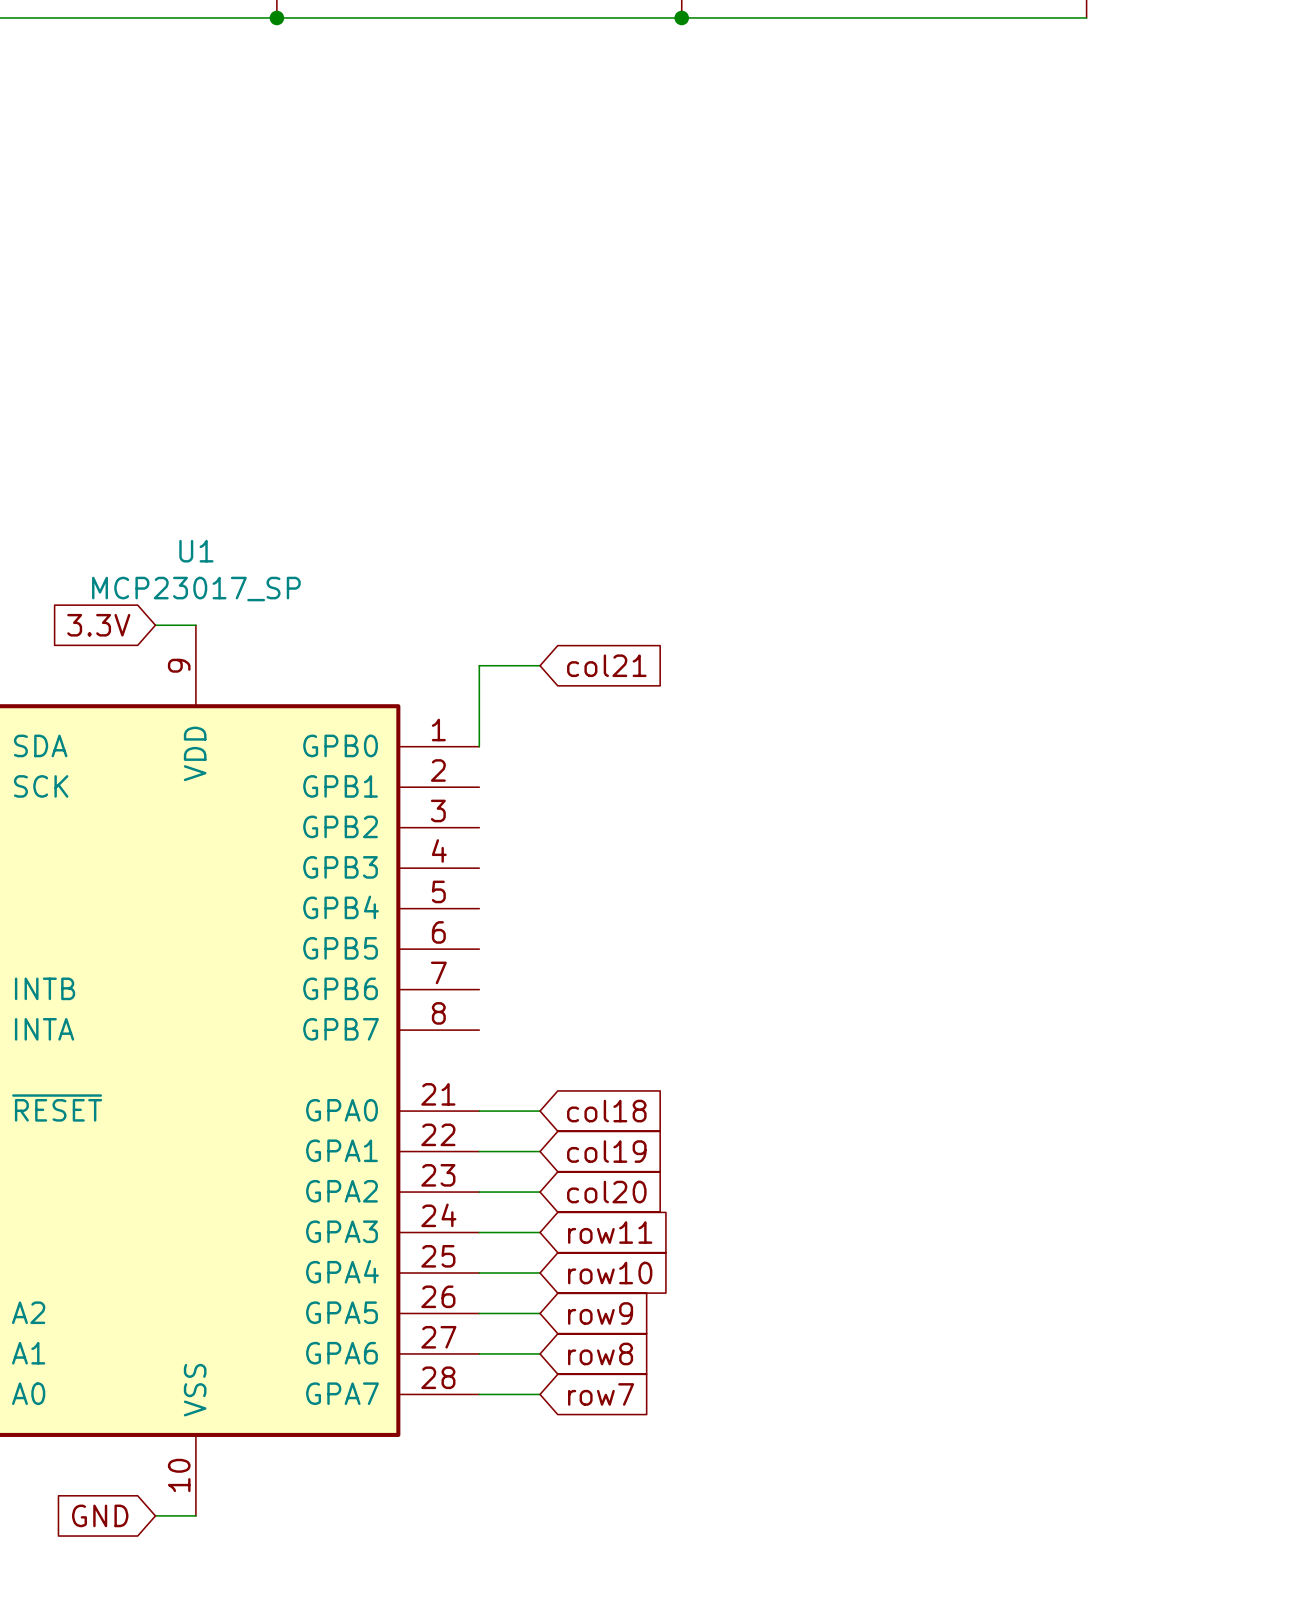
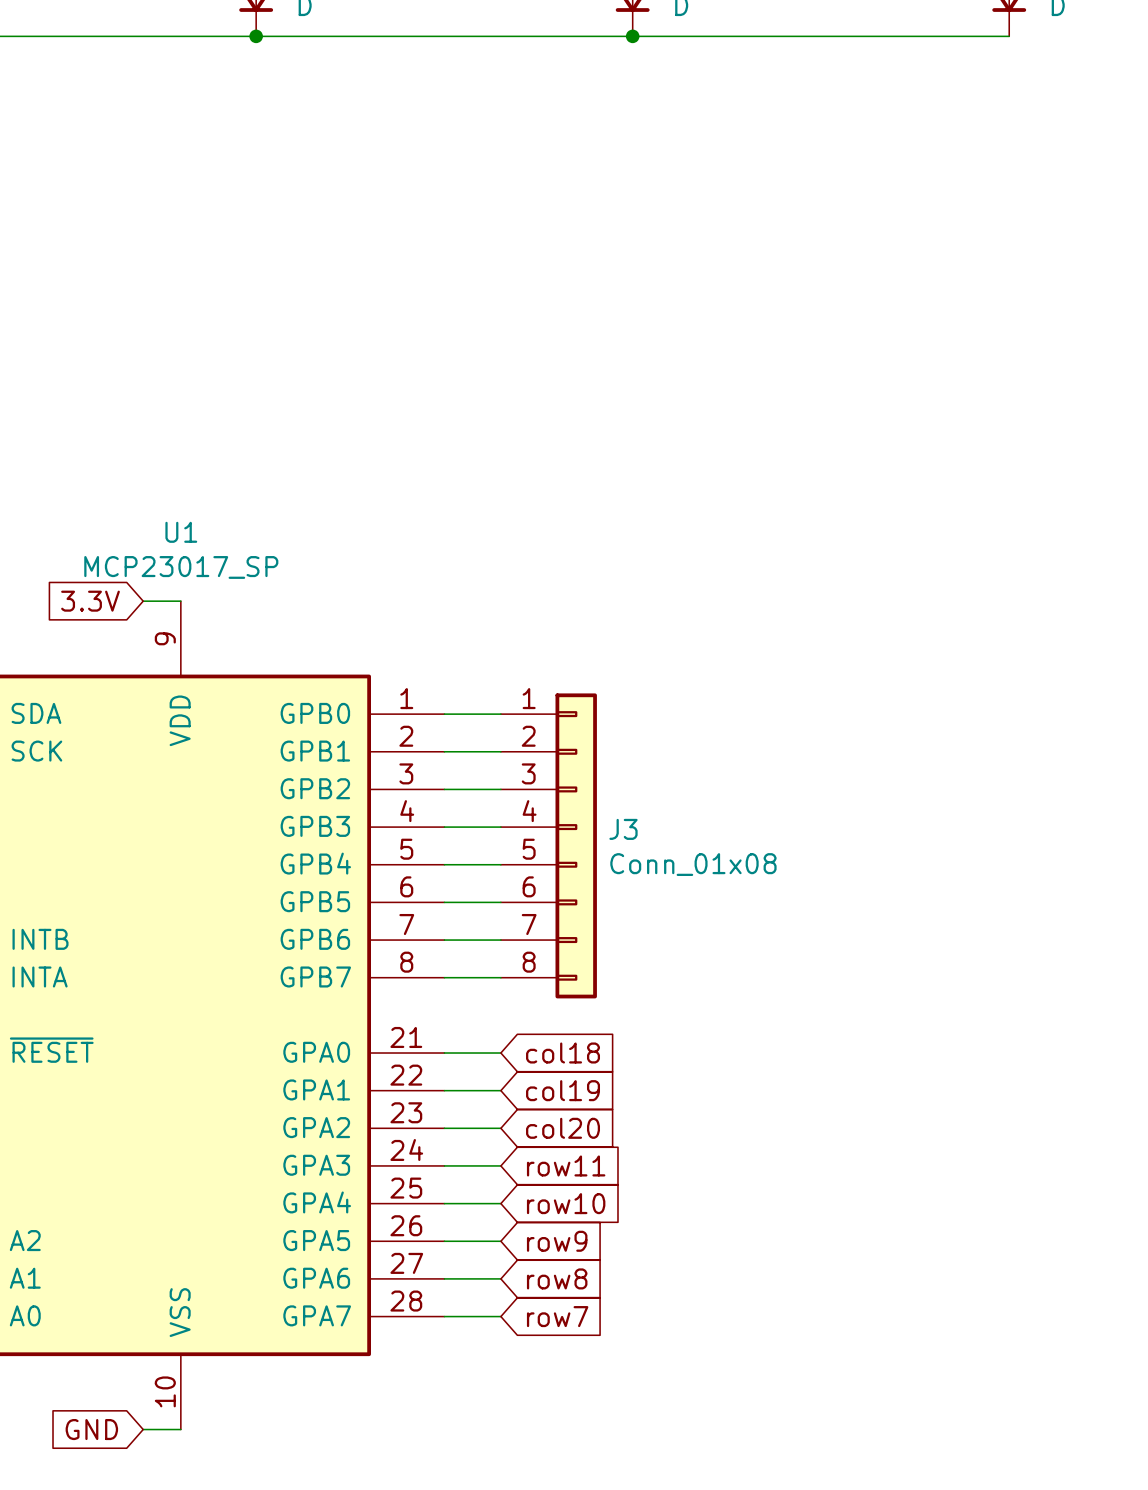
wire: (540, 665) (479, 665) (479, 746) -> (500, 714) (444, 714)
global label: col21 (606, 665) -> none
wire: none -> (444, 751) (500, 751)
wire: none -> (444, 789) (500, 789)
wire: none -> (444, 827) (500, 827)
J3: none -> Conn_01x08 (548, 845)
wire: none -> (444, 864) (500, 864)
wire: none -> (444, 902) (500, 902)
wire: none -> (444, 940) (500, 940)
wire: none -> (444, 977) (500, 977)

